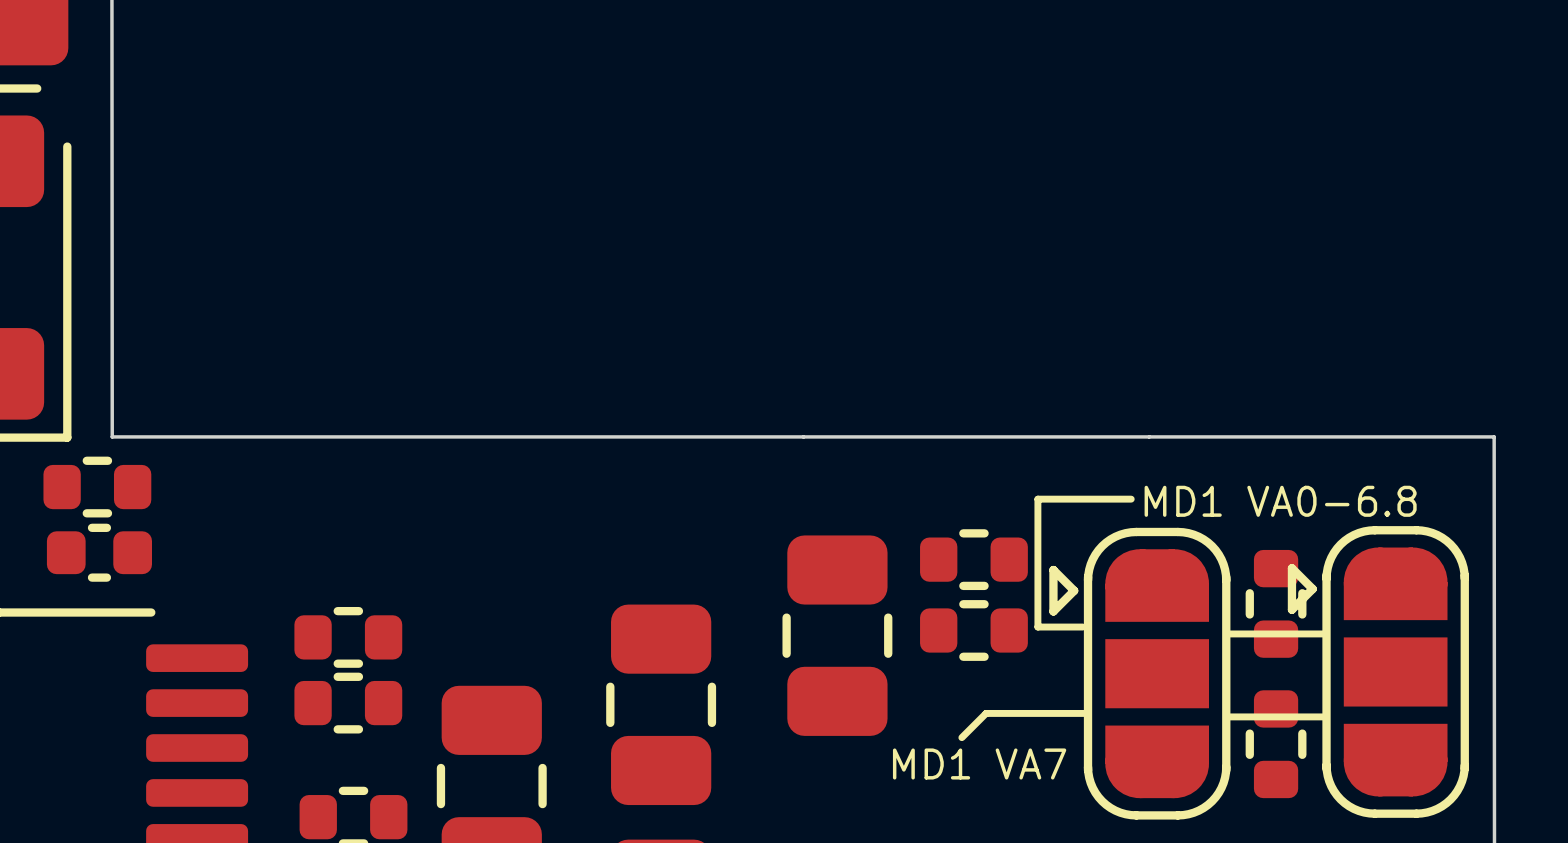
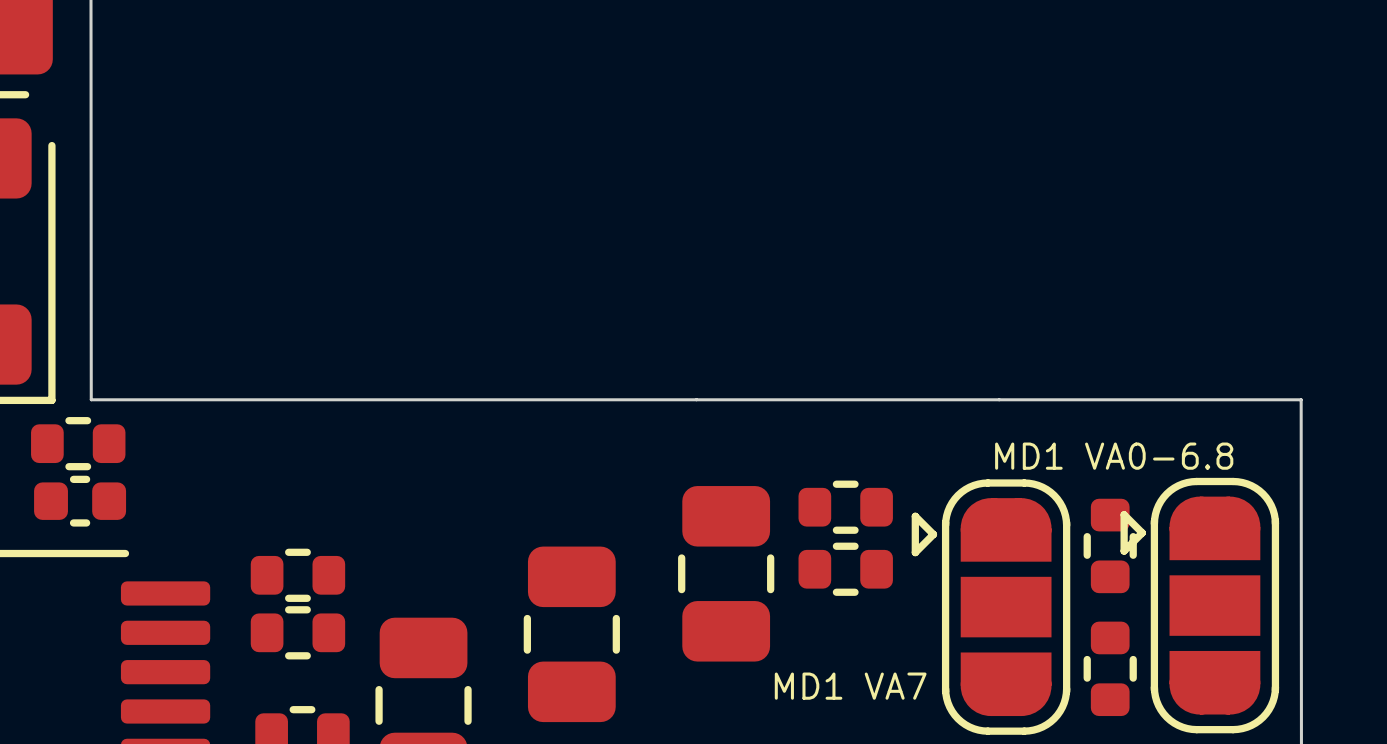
line: (1131, 499) (1037, 499) (1037, 627) (1082, 627) -> none
line: (1228, 633) (1324, 633) -> none
line: (1086, 713) (986, 713) (961, 737) -> none
line: (1228, 716) (1324, 716) -> none

